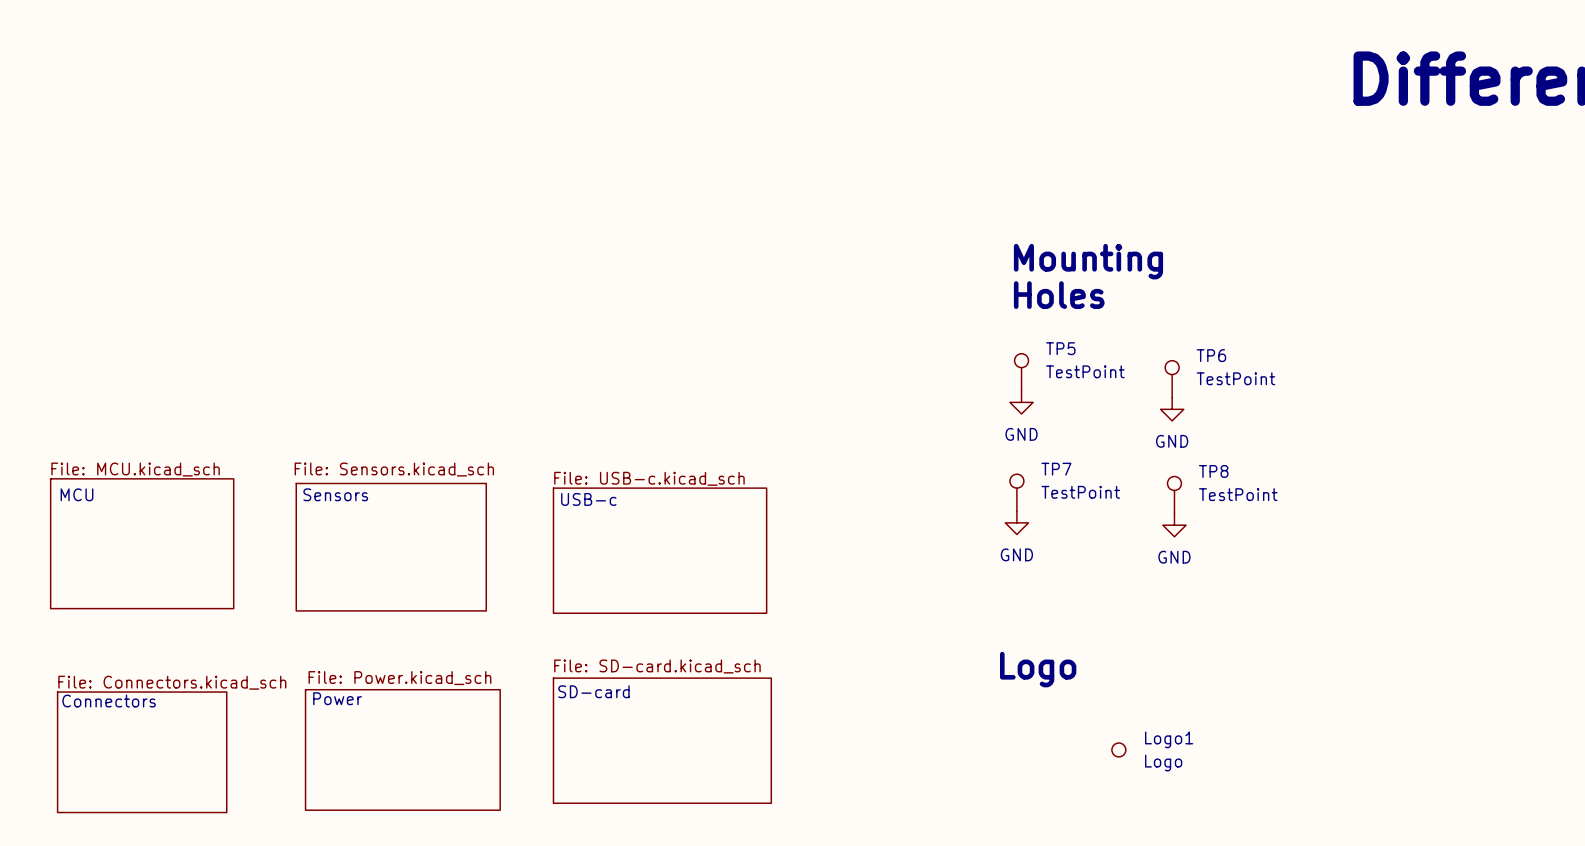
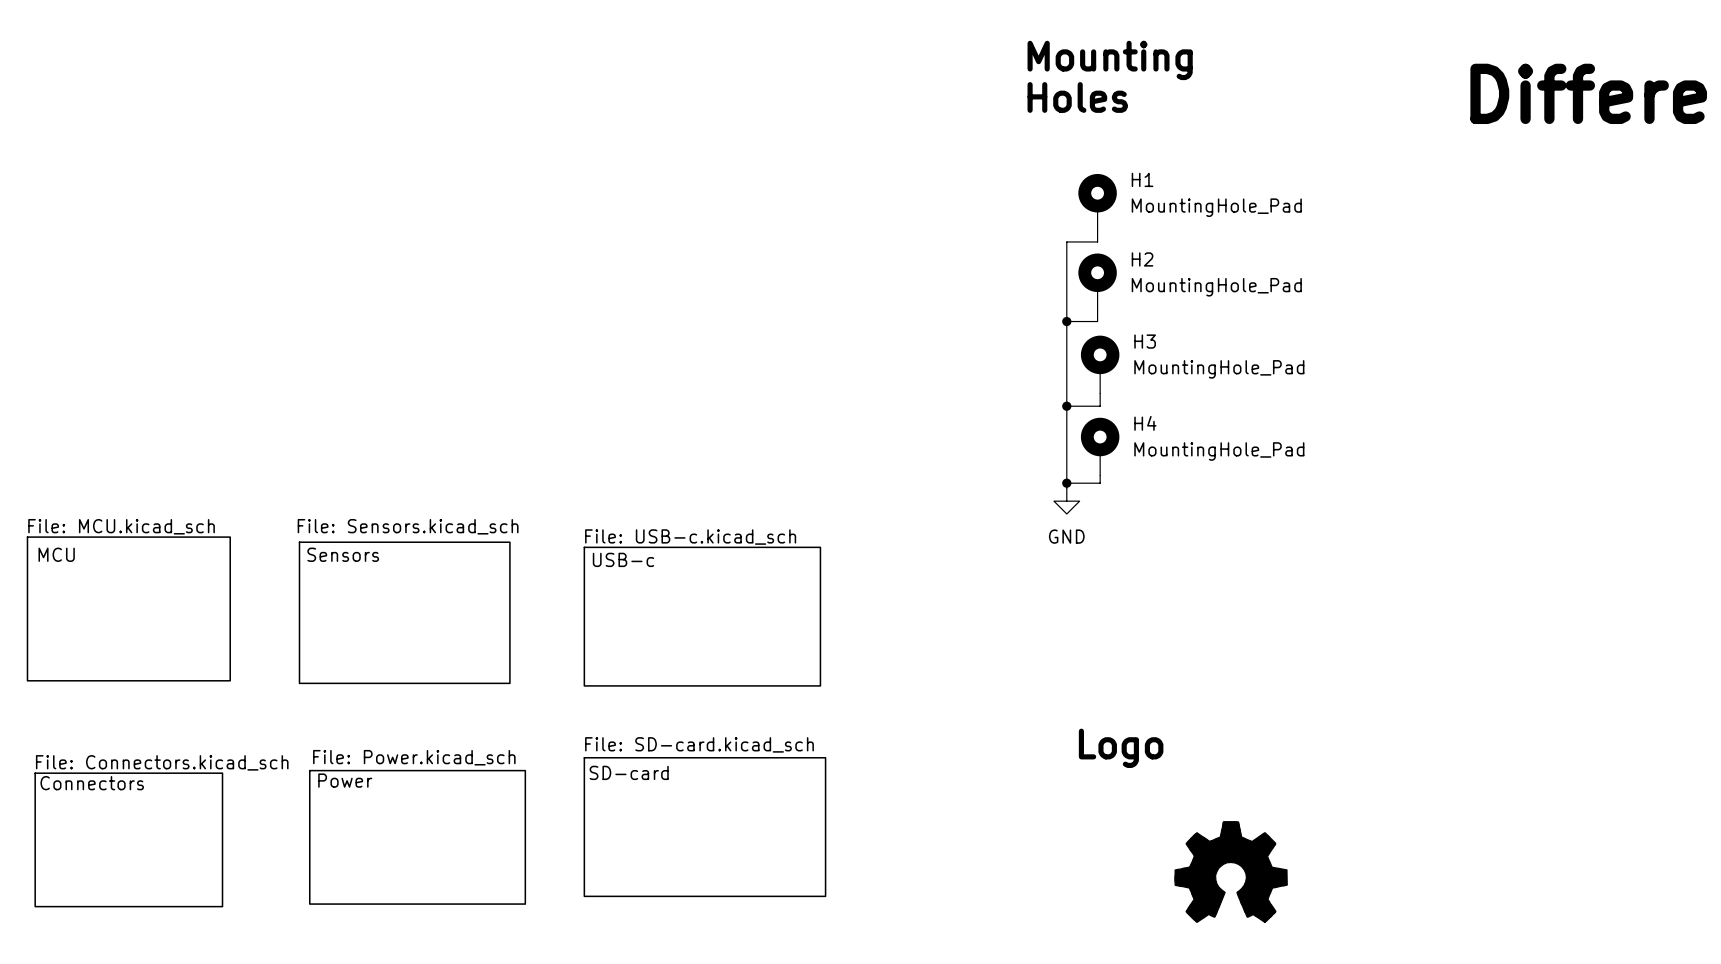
H1: none -> MountingHole_Pad (1097, 202)
wire: none -> (1097, 231) (1097, 241) (1066, 241) (1066, 488)
H2: none -> MountingHole_Pad (1097, 282)
text position: Mounting (1088, 261) -> Mounting (1110, 60)
wire: none -> (1097, 311) (1097, 321) (1066, 321)
junction: none -> (1066, 321)
text position: Holes (1059, 295) -> Holes (1077, 97)
H3: none -> MountingHole_Pad (1100, 364)
wire: none -> (1100, 393) (1100, 406) (1066, 406)
junction: none -> (1066, 406)
TP5: TestPoint (1021, 372) -> none
TP6: TestPoint (1172, 379) -> none
H4: none -> MountingHole_Pad (1100, 446)
power symbol: GND (1021, 402) -> none
power symbol: GND (1172, 409) -> none
wire: none -> (1100, 475) (1100, 483) (1066, 483)
junction: none -> (1066, 483)
power symbol: none -> GND (1066, 501)
TP7: TestPoint (1016, 492) -> none
TP8: TestPoint (1174, 495) -> none
power symbol: GND (1016, 522) -> none
power symbol: GND (1174, 525) -> none
Logo1: Logo (1118, 749) -> none
part: none -> (1231, 871)

